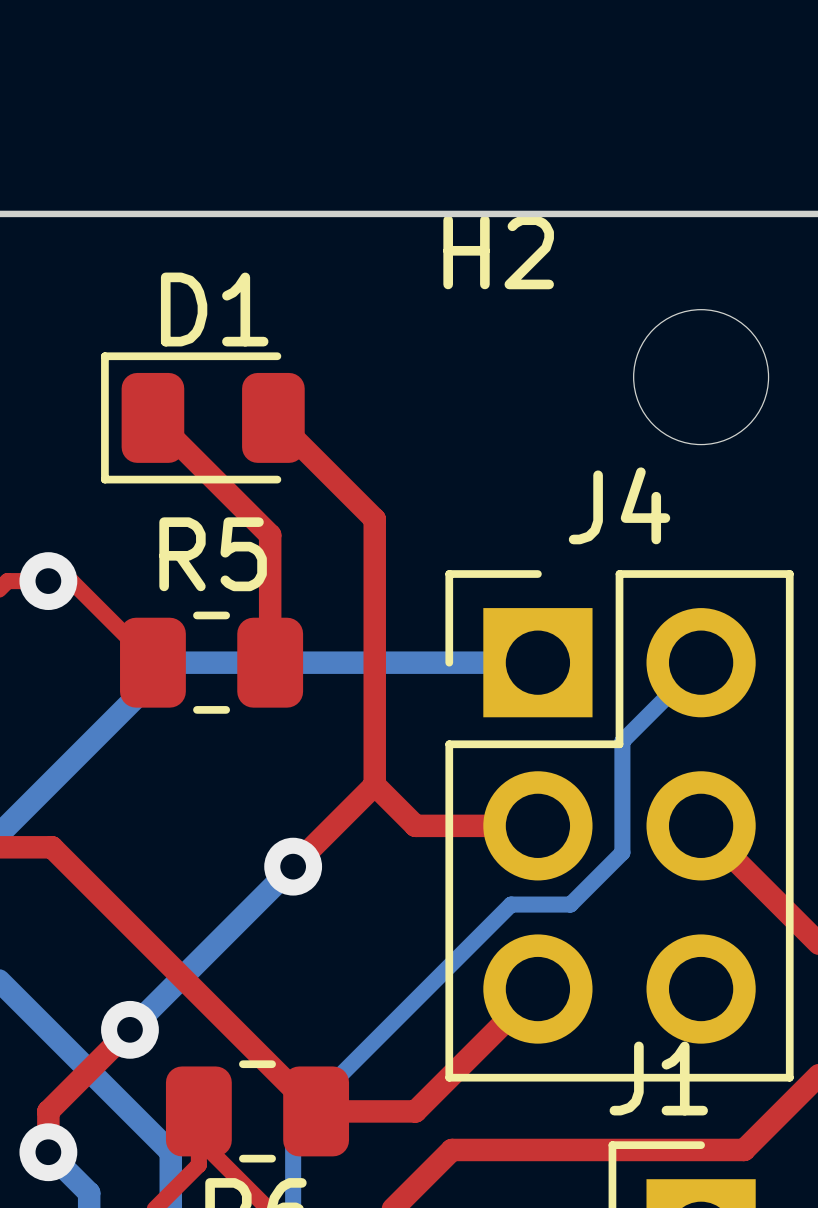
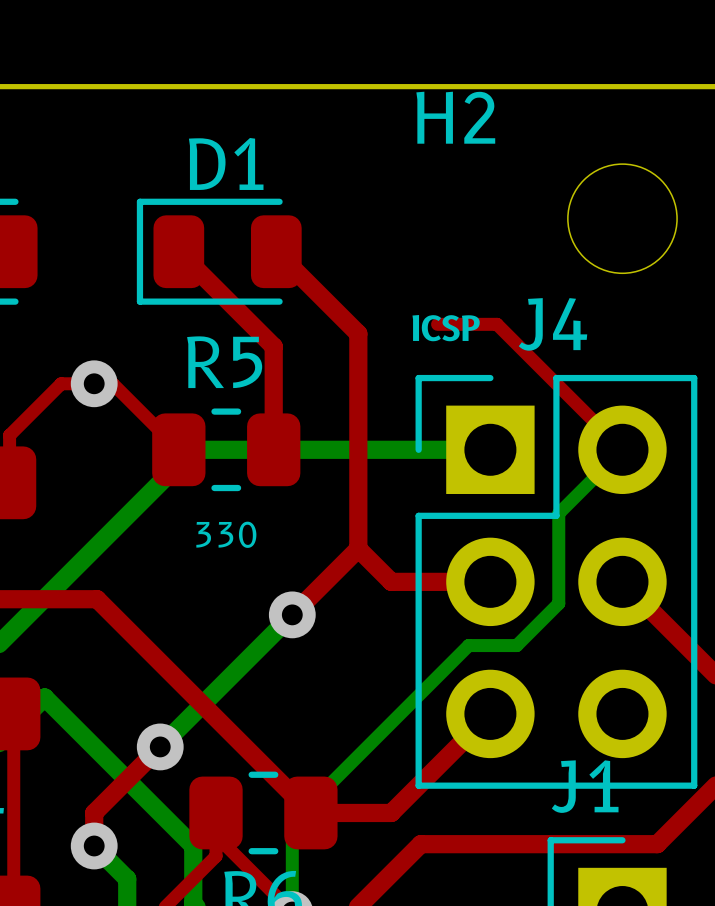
top track: none -> (437, 324) (497, 324) (622, 449)
text: none -> ICSP (446, 328)
R5 value: none -> 330 (226, 534)

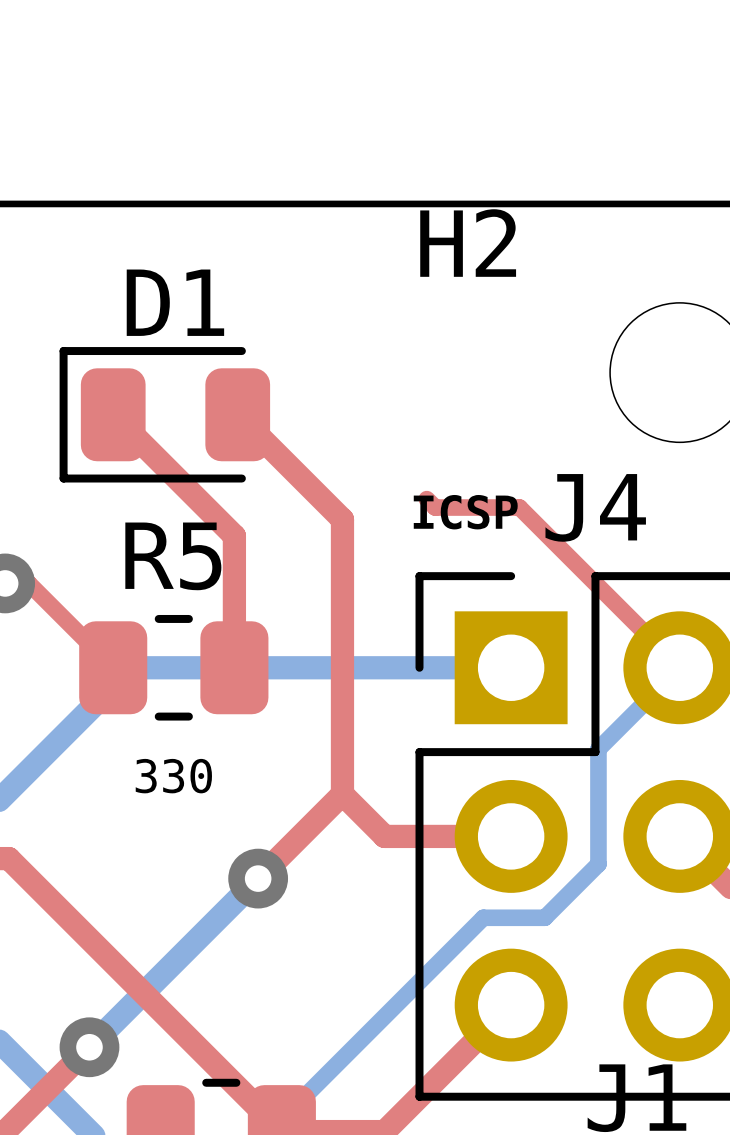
top track: none -> (426, 499) (435, 507) (443, 507)

